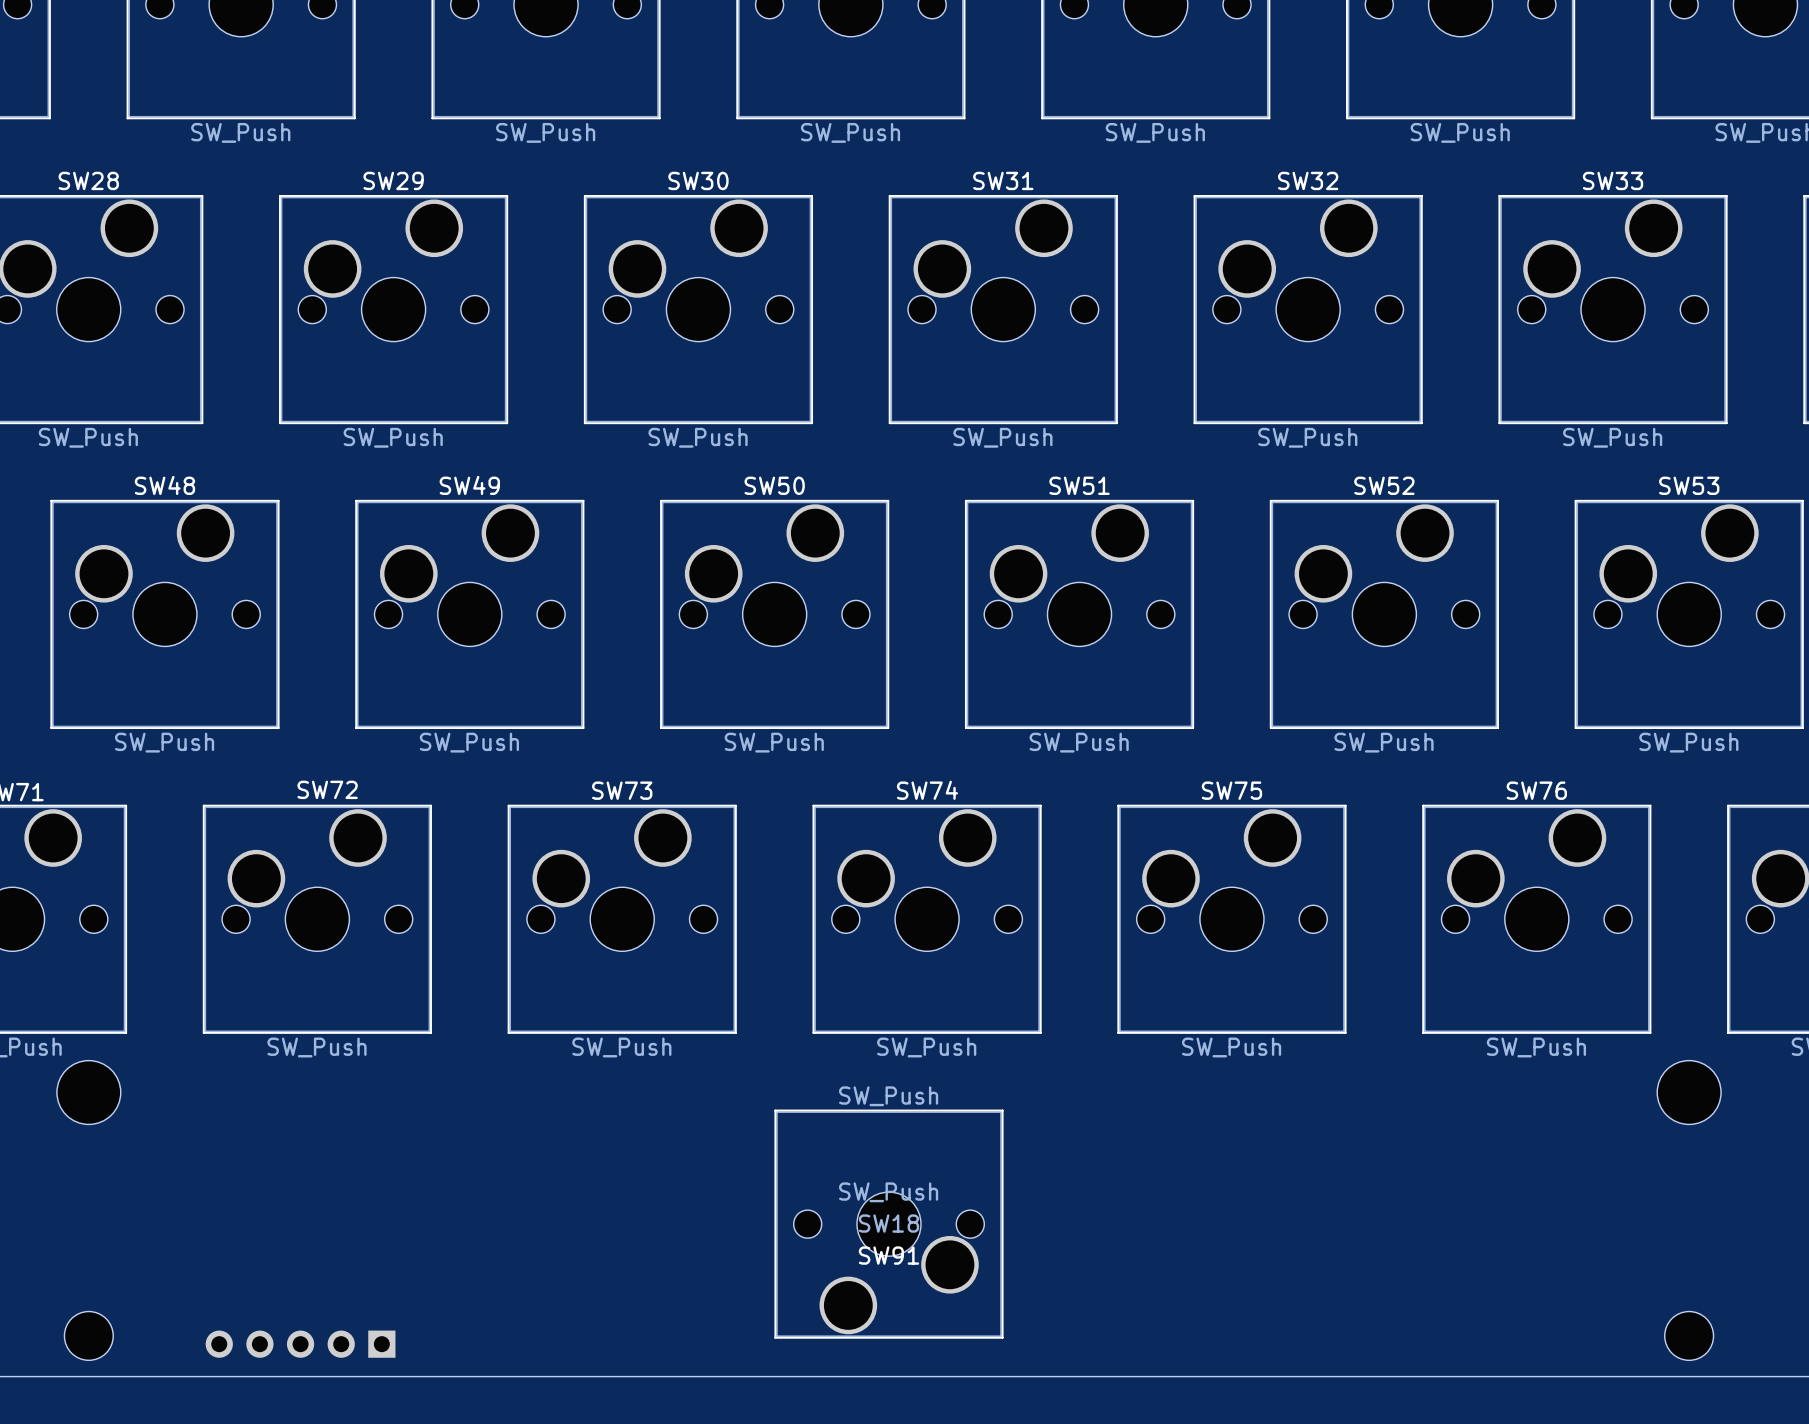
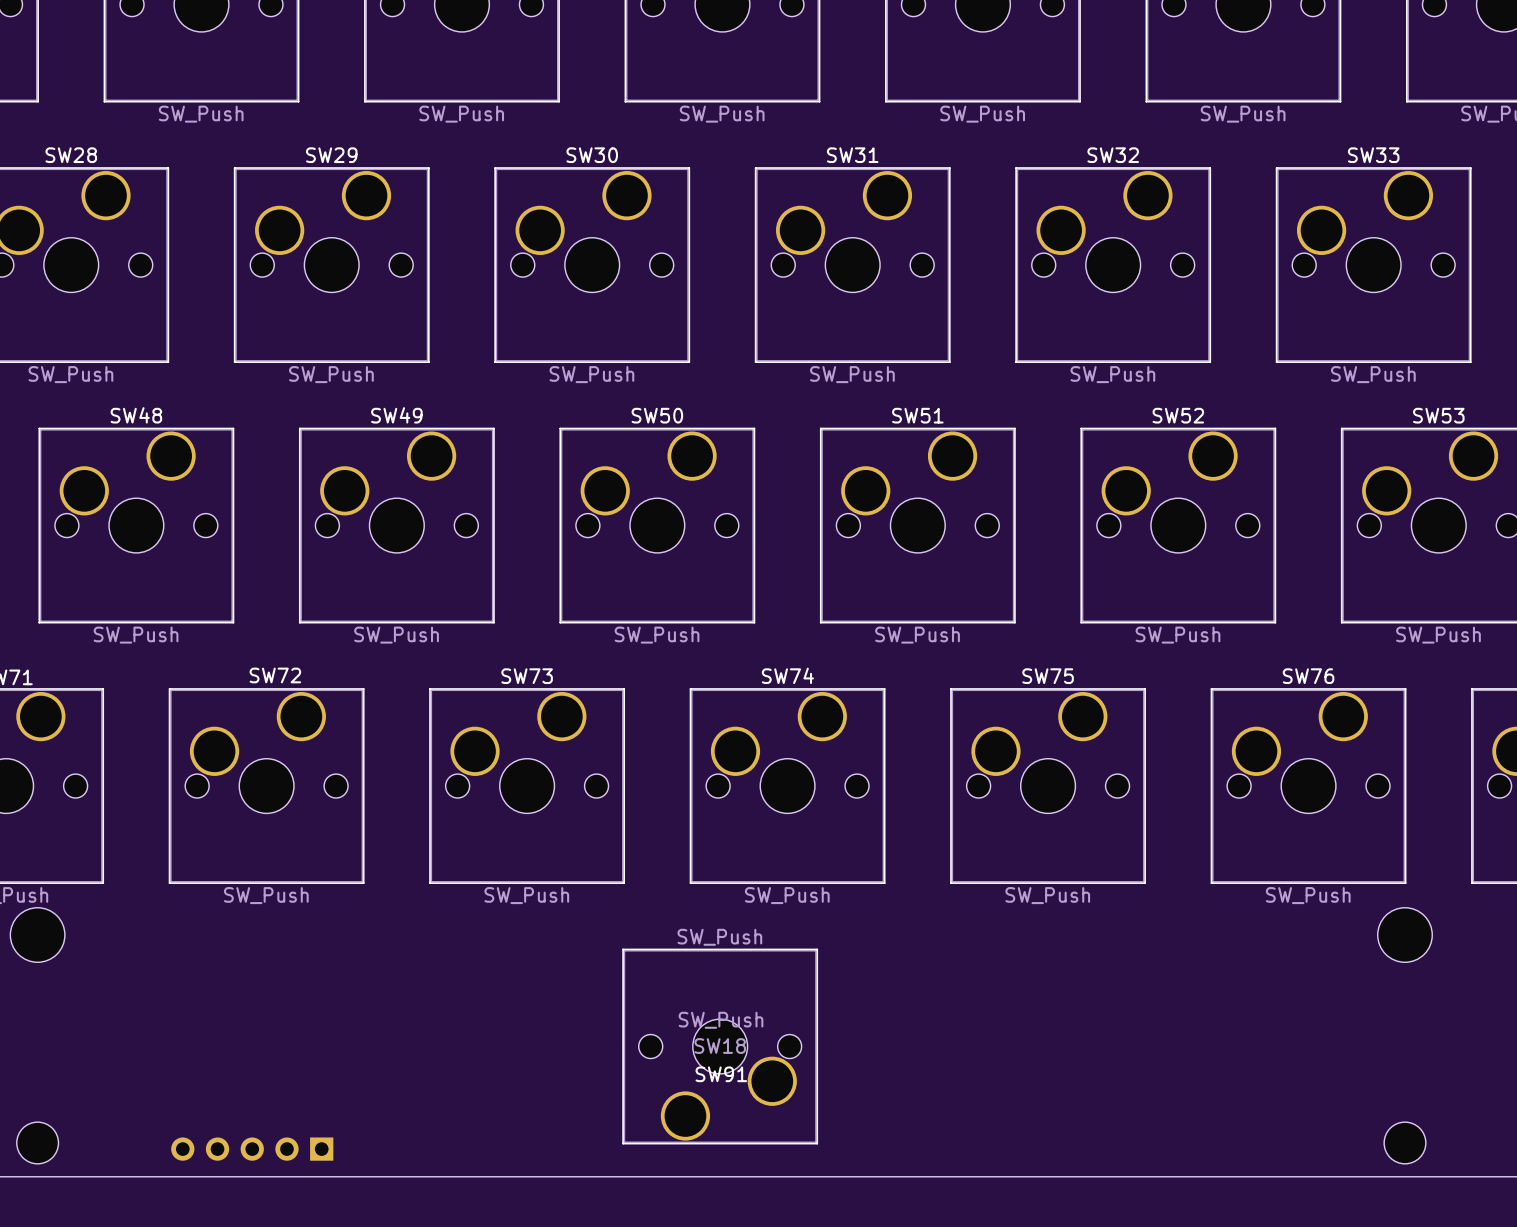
SW91 position: (888, 1210) -> (721, 1035)
SW18 position: (888, 1224) -> (720, 1046)

